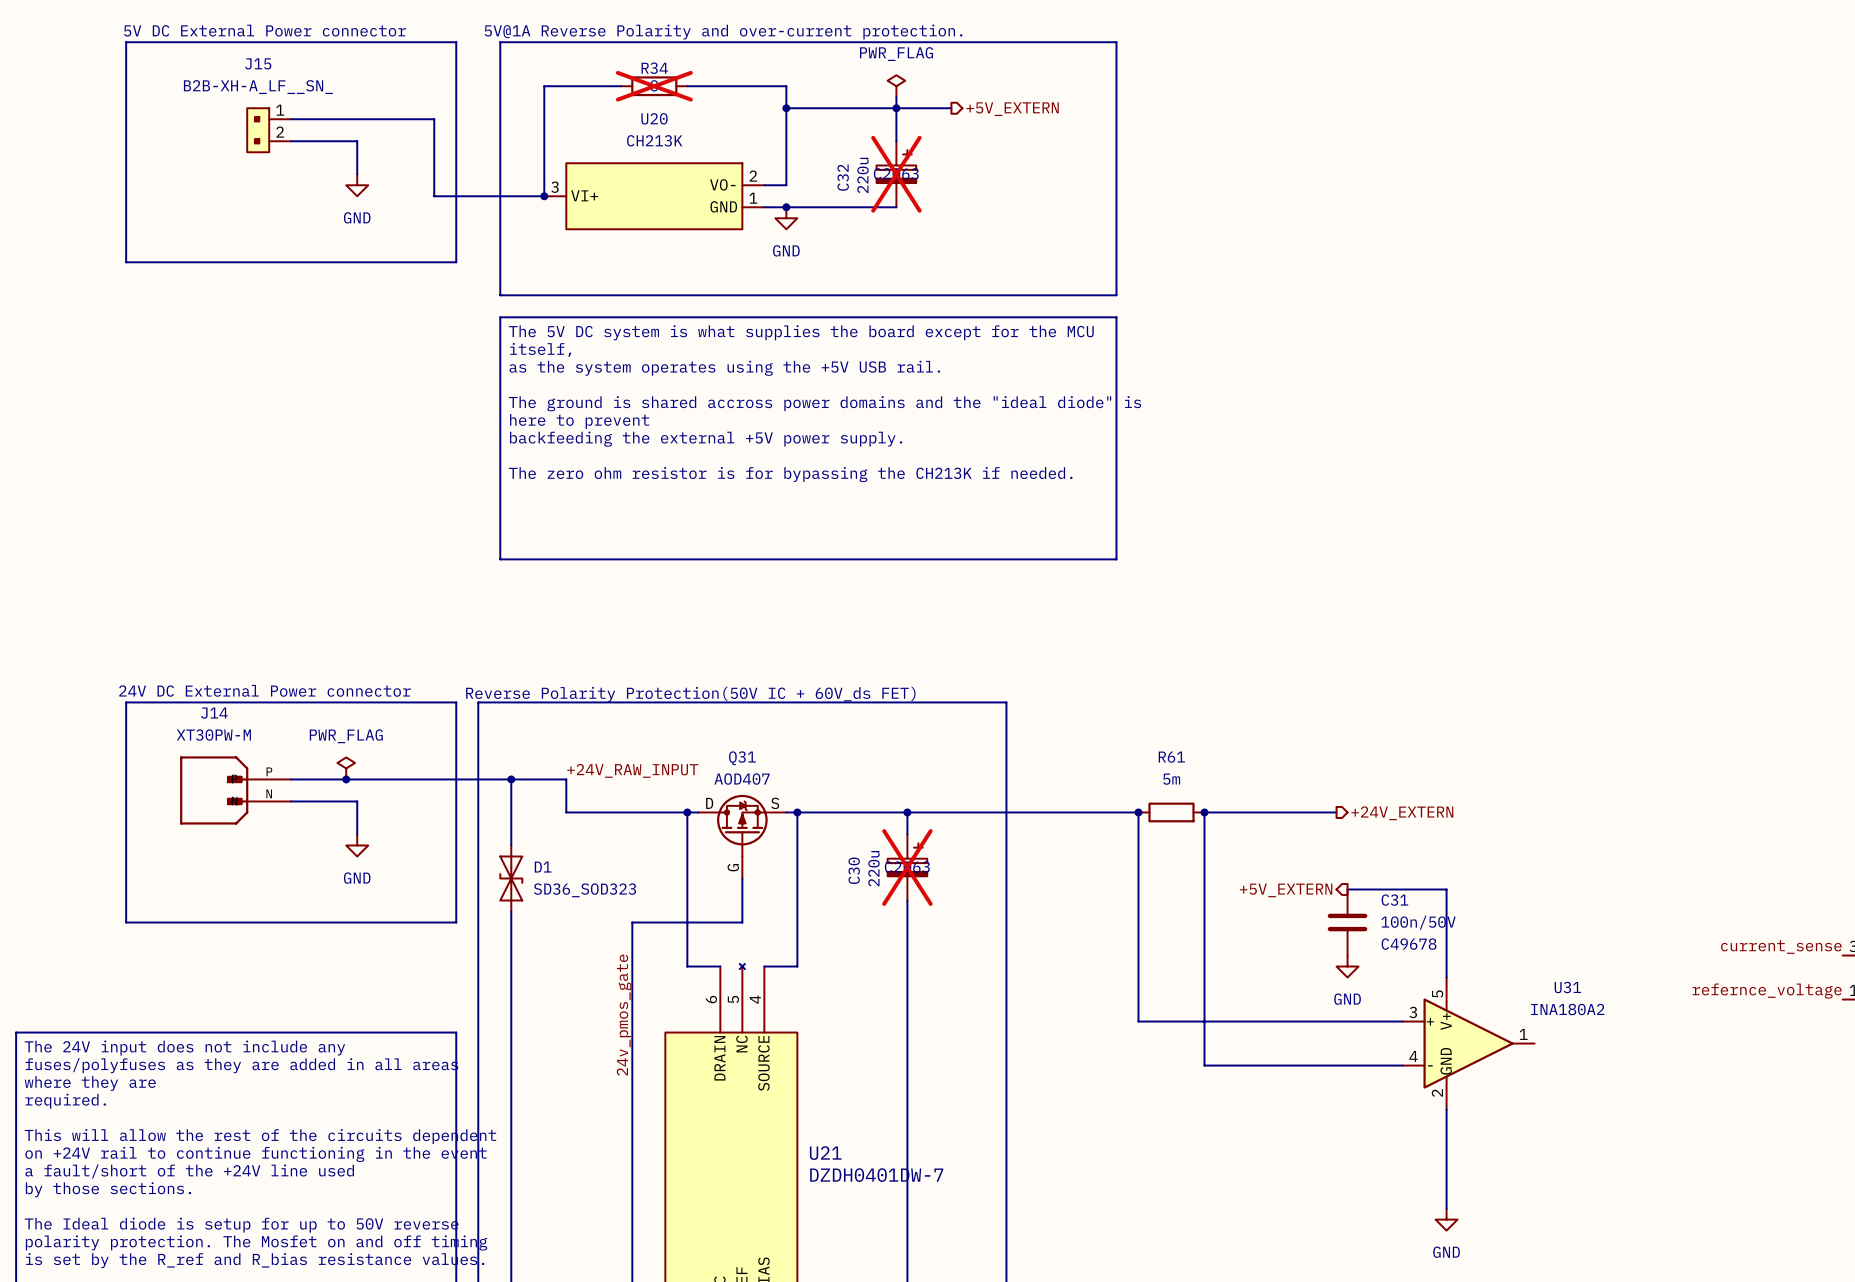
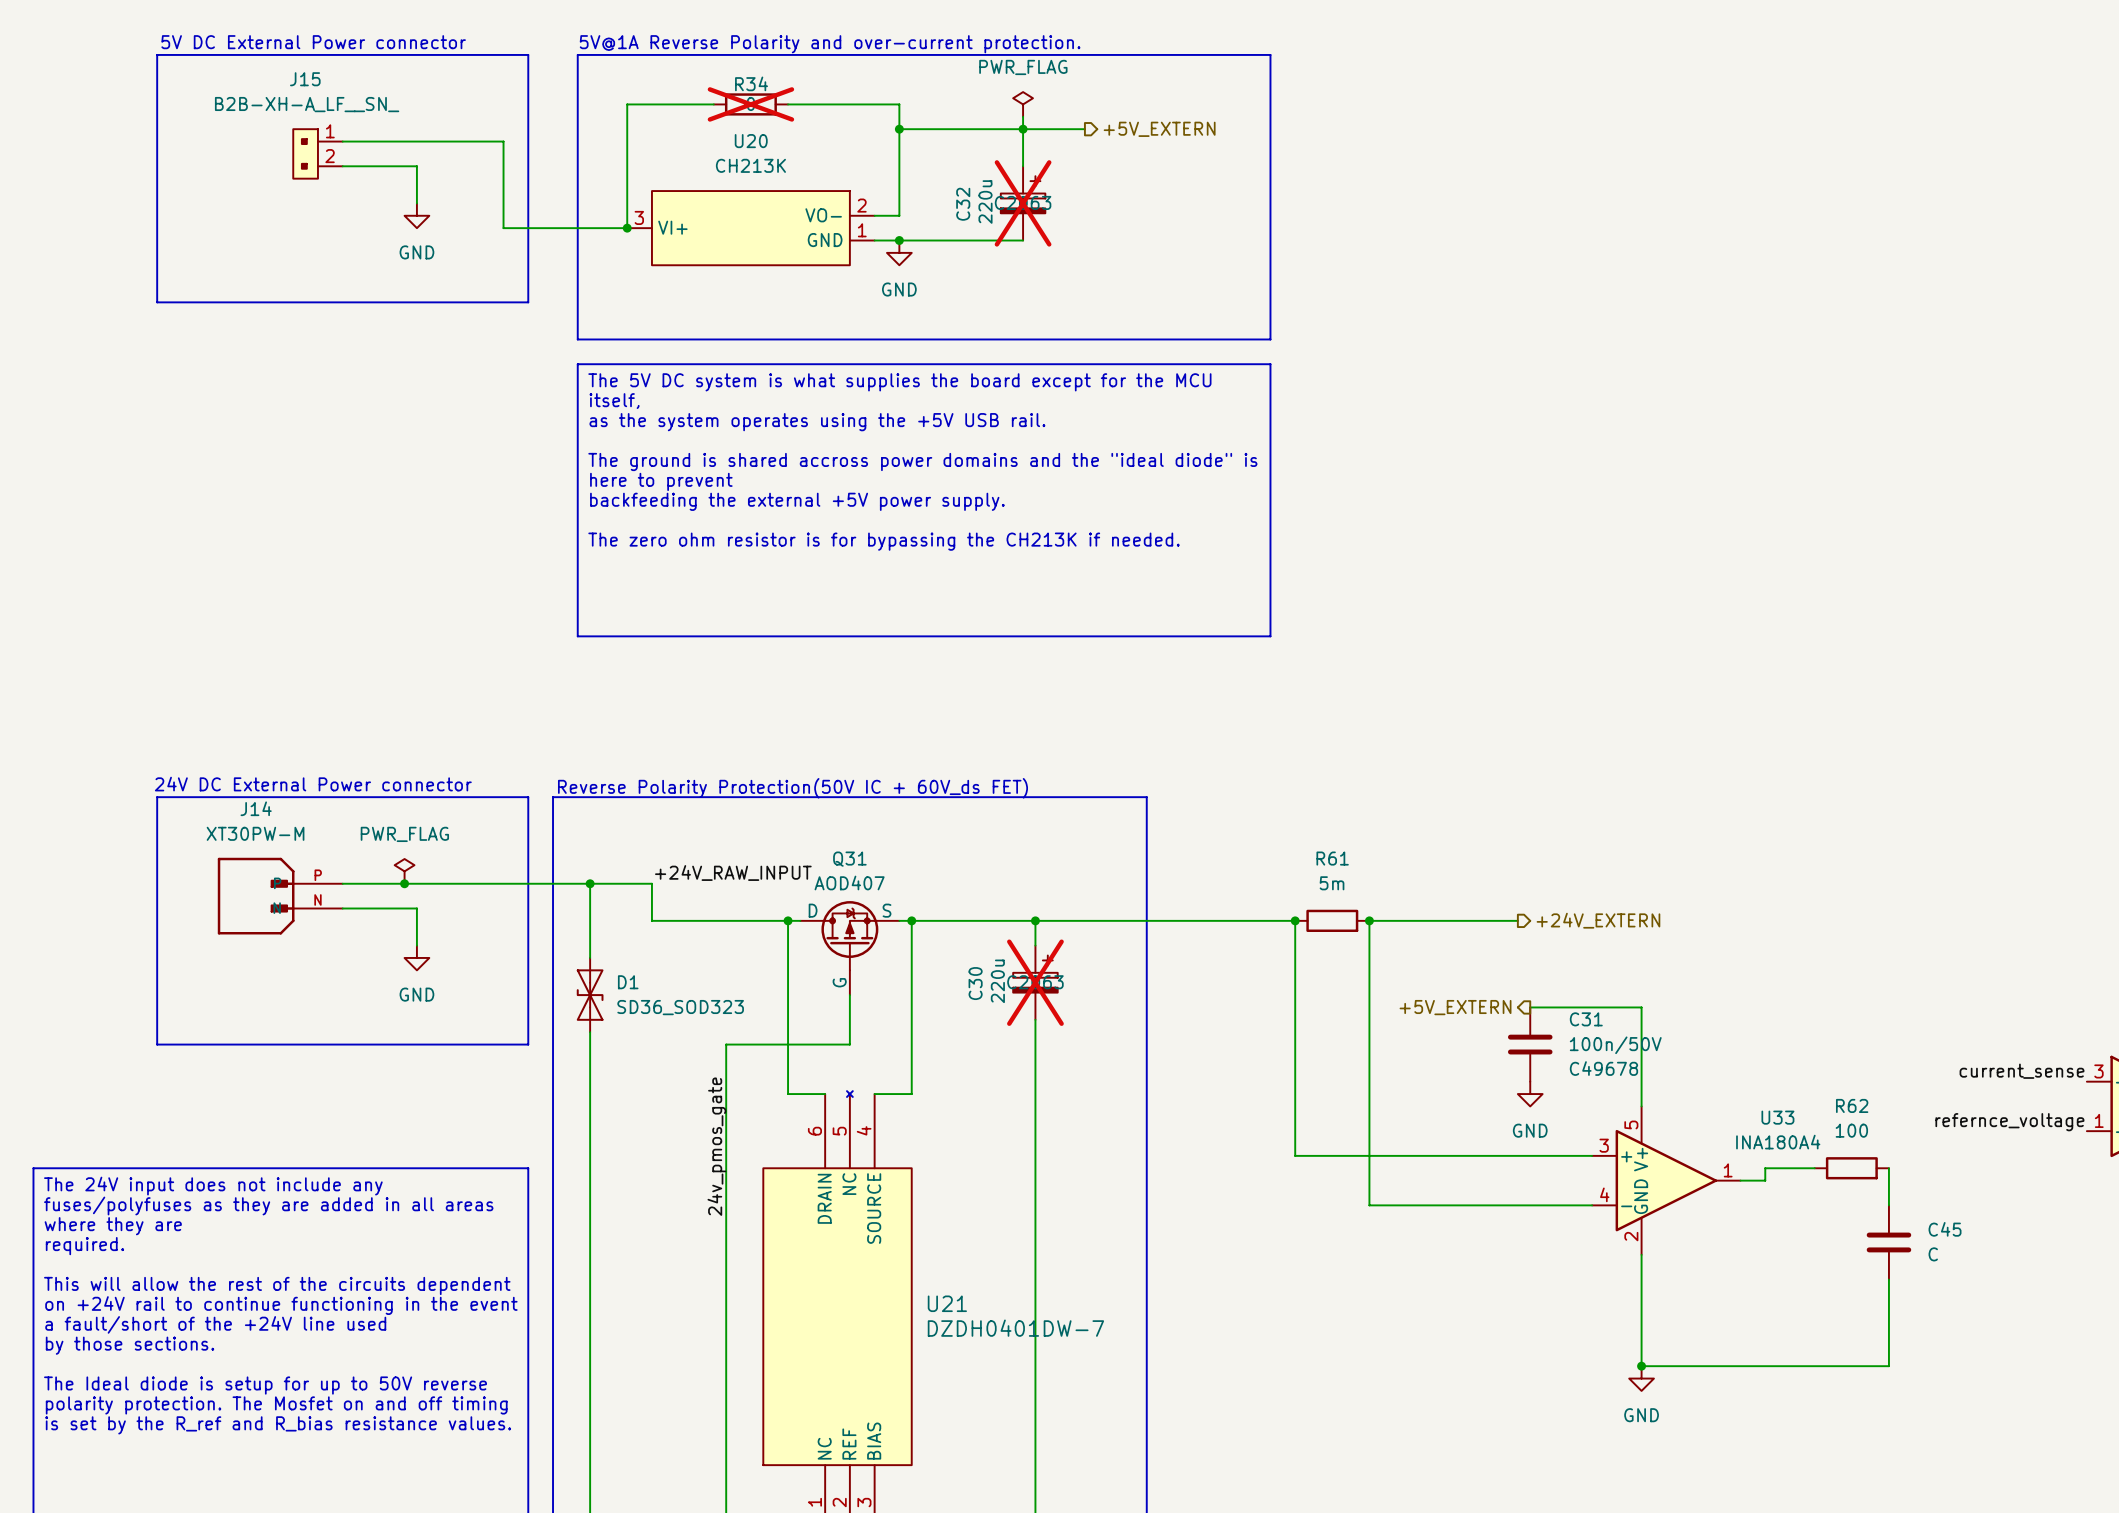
U31 name: U31 (1567, 987) -> U33 (1777, 1117)
U31 value: INA180A2 (1567, 1009) -> INA180A4 (1778, 1142)
wire: none -> (1814, 1168) (1765, 1168) (1765, 1180) (1740, 1180)
R62: none -> 100 (1851, 1168)
wire: none -> (1888, 1168) (1888, 1205)
C45: none -> C (1888, 1242)
wire: none -> (1888, 1279) (1888, 1366) (1641, 1366)
junction: none -> (1641, 1366)

